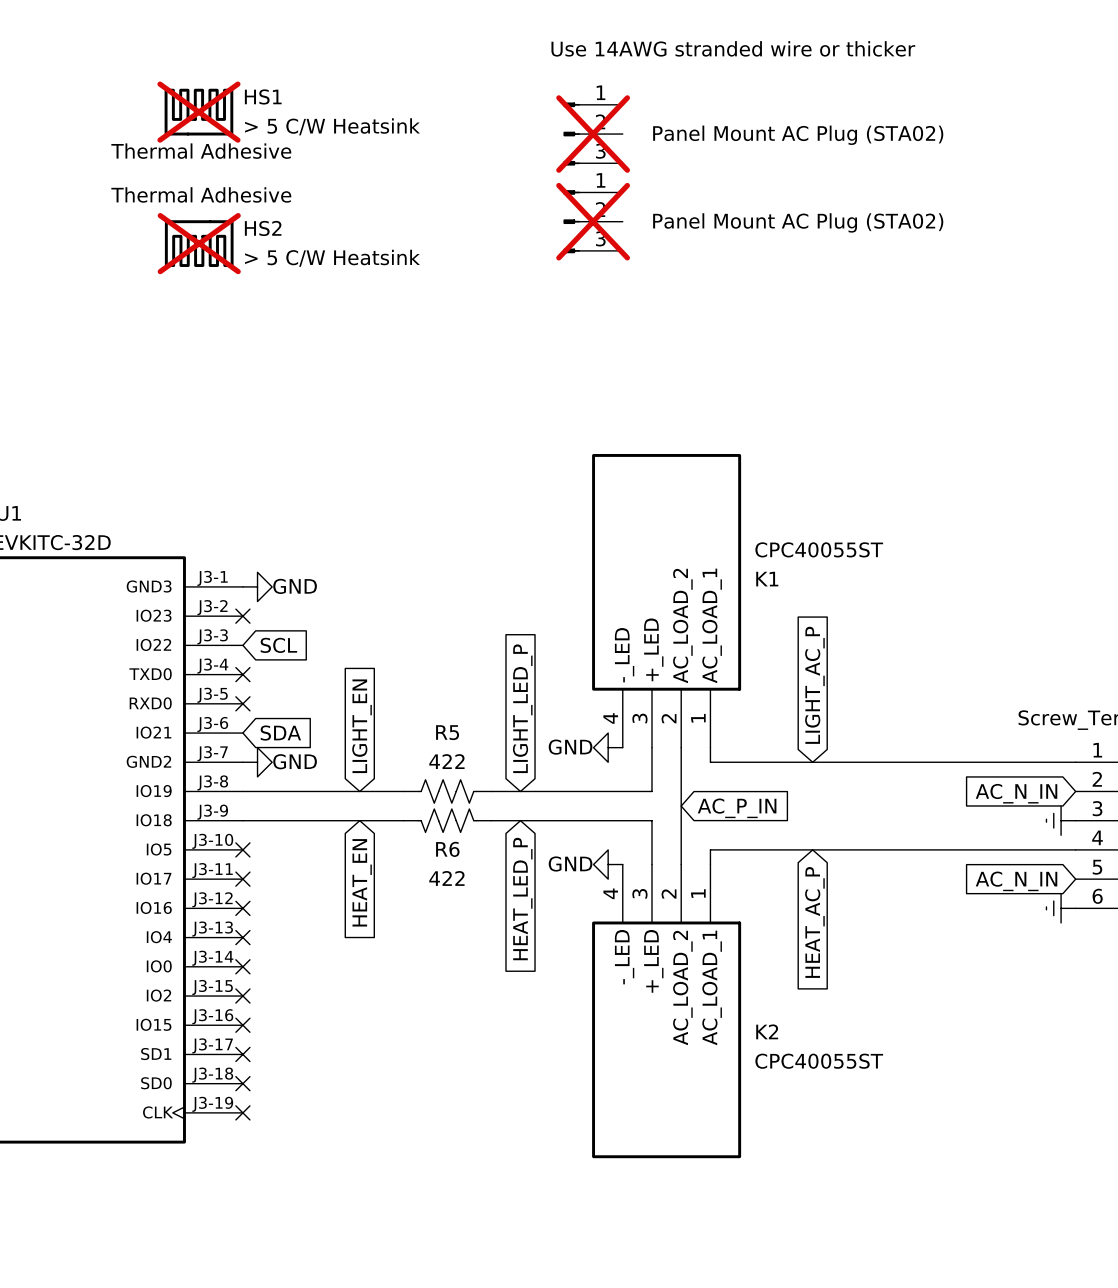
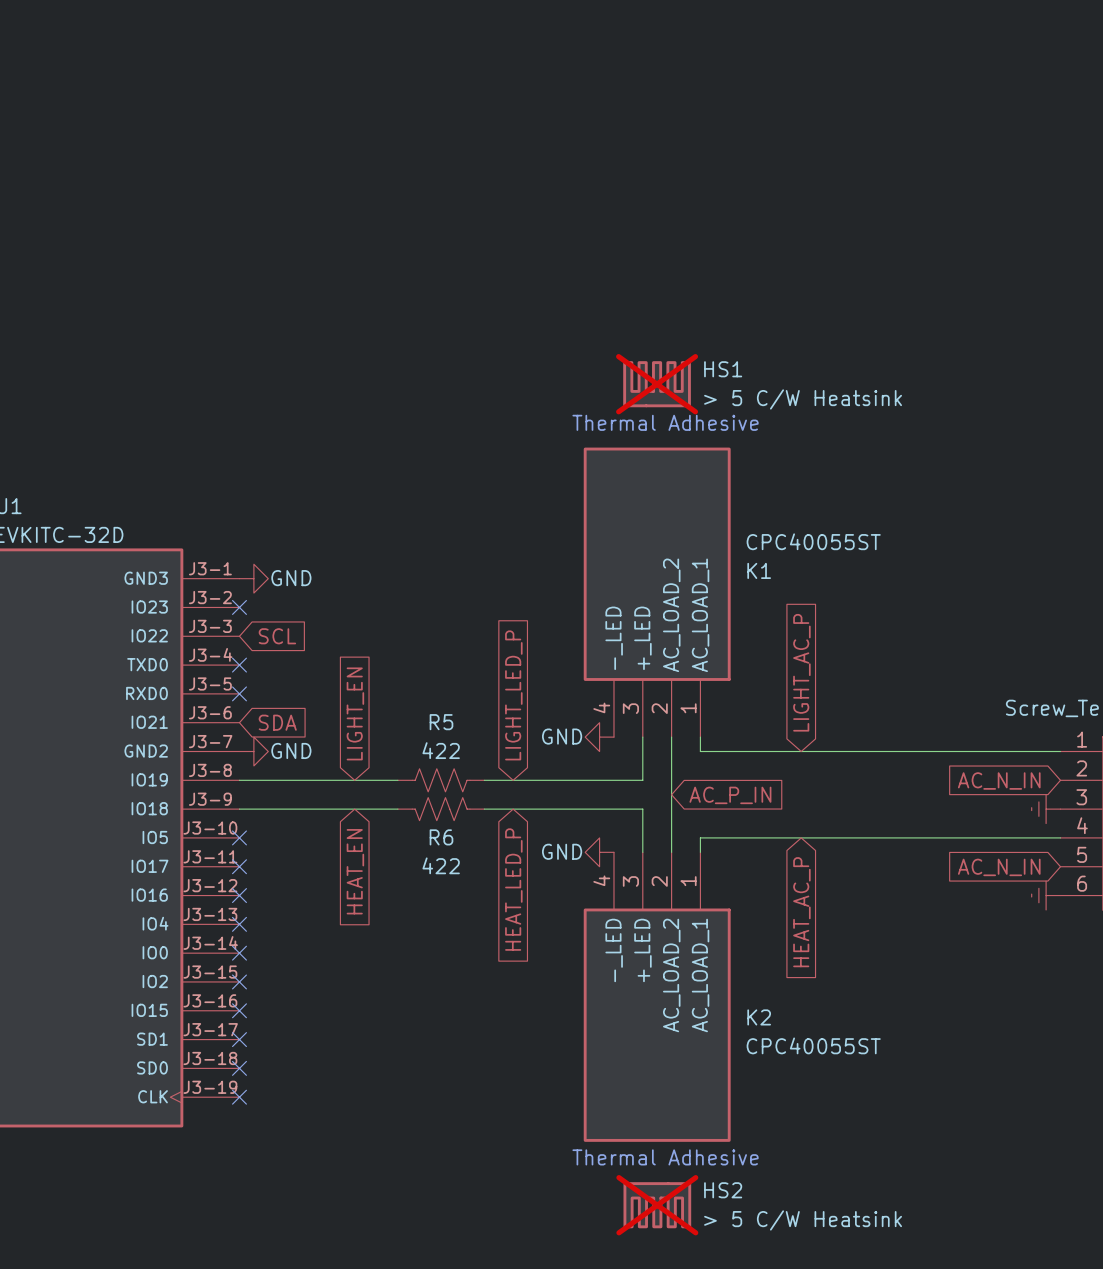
text: Use 14AWG stranded wire or thicker (733, 48) -> none
HS1 position: (198, 112) -> (657, 384)
part: Panel Mount AC Plug (STA02) (593, 134) -> none
text: Thermal Adhesive (201, 151) -> none
text: Thermal Adhesive (201, 194) -> none
part: Panel Mount AC Plug (STA02) (593, 221) -> none
HS2 position: (199, 243) -> (657, 1205)
text: none -> Thermal Adhesive (665, 422)
text: none -> Thermal Adhesive (665, 1157)

